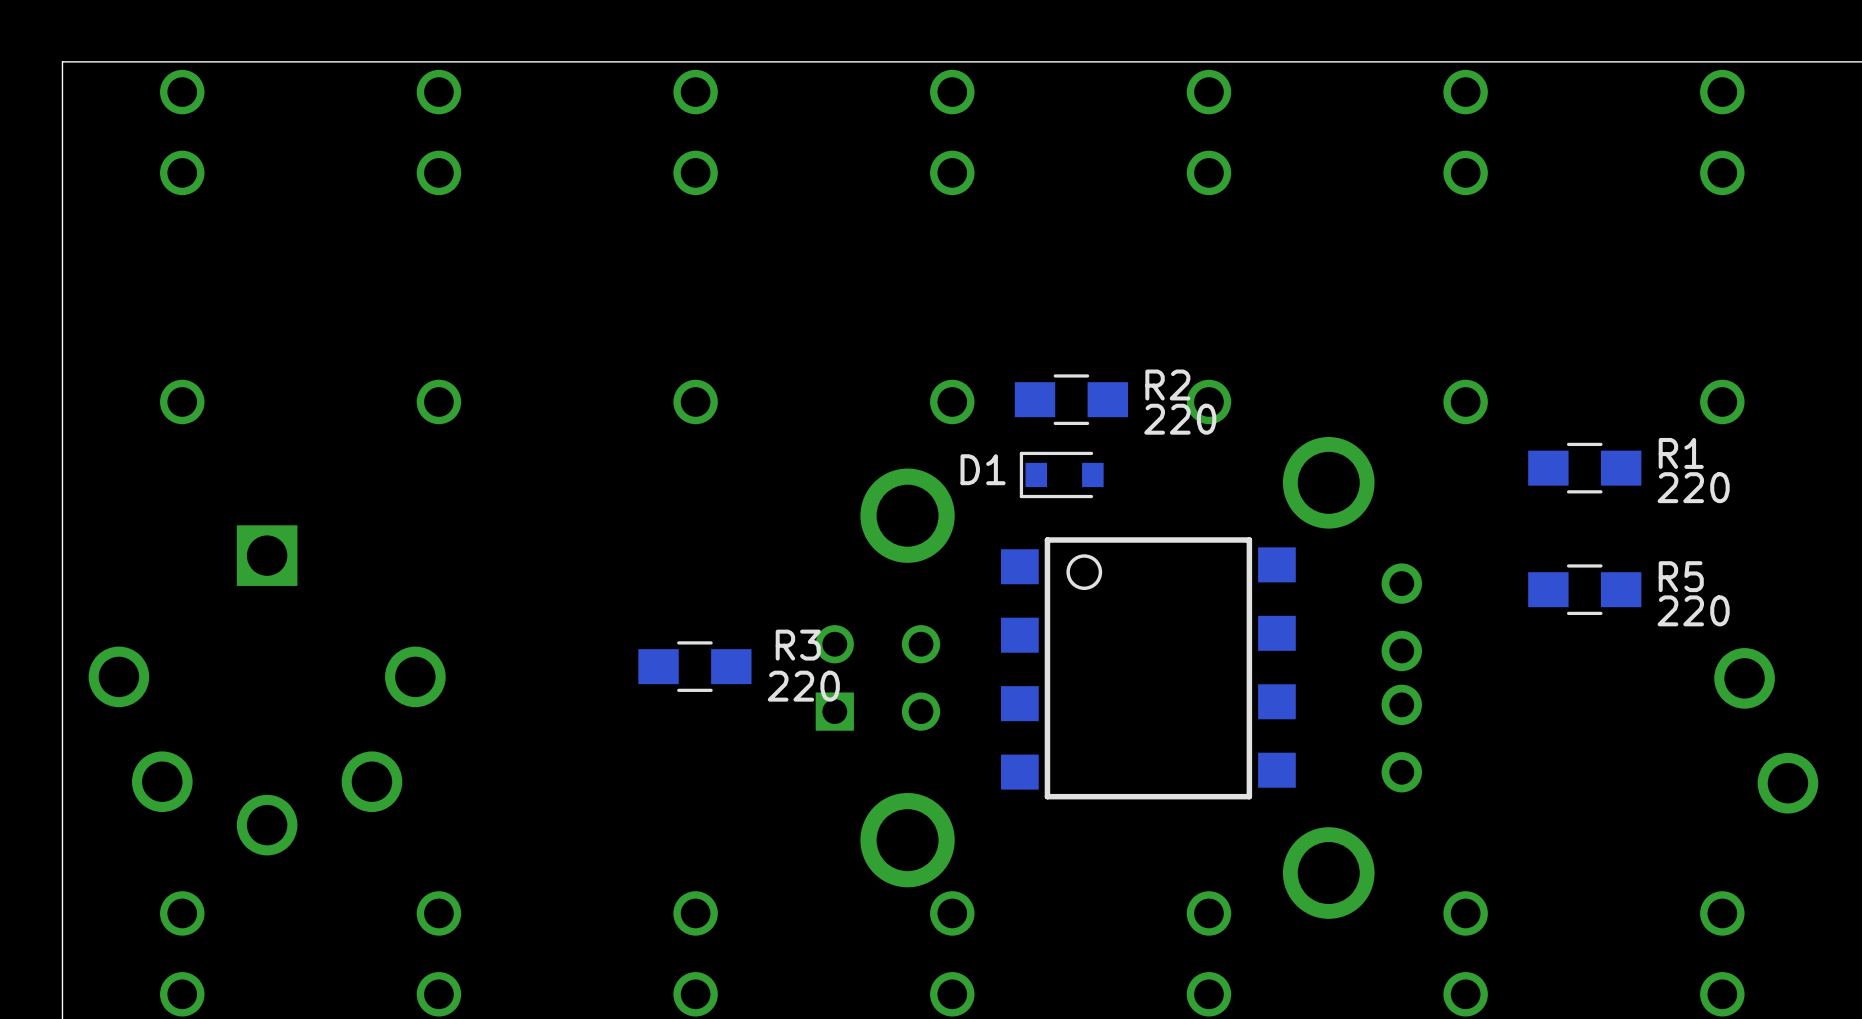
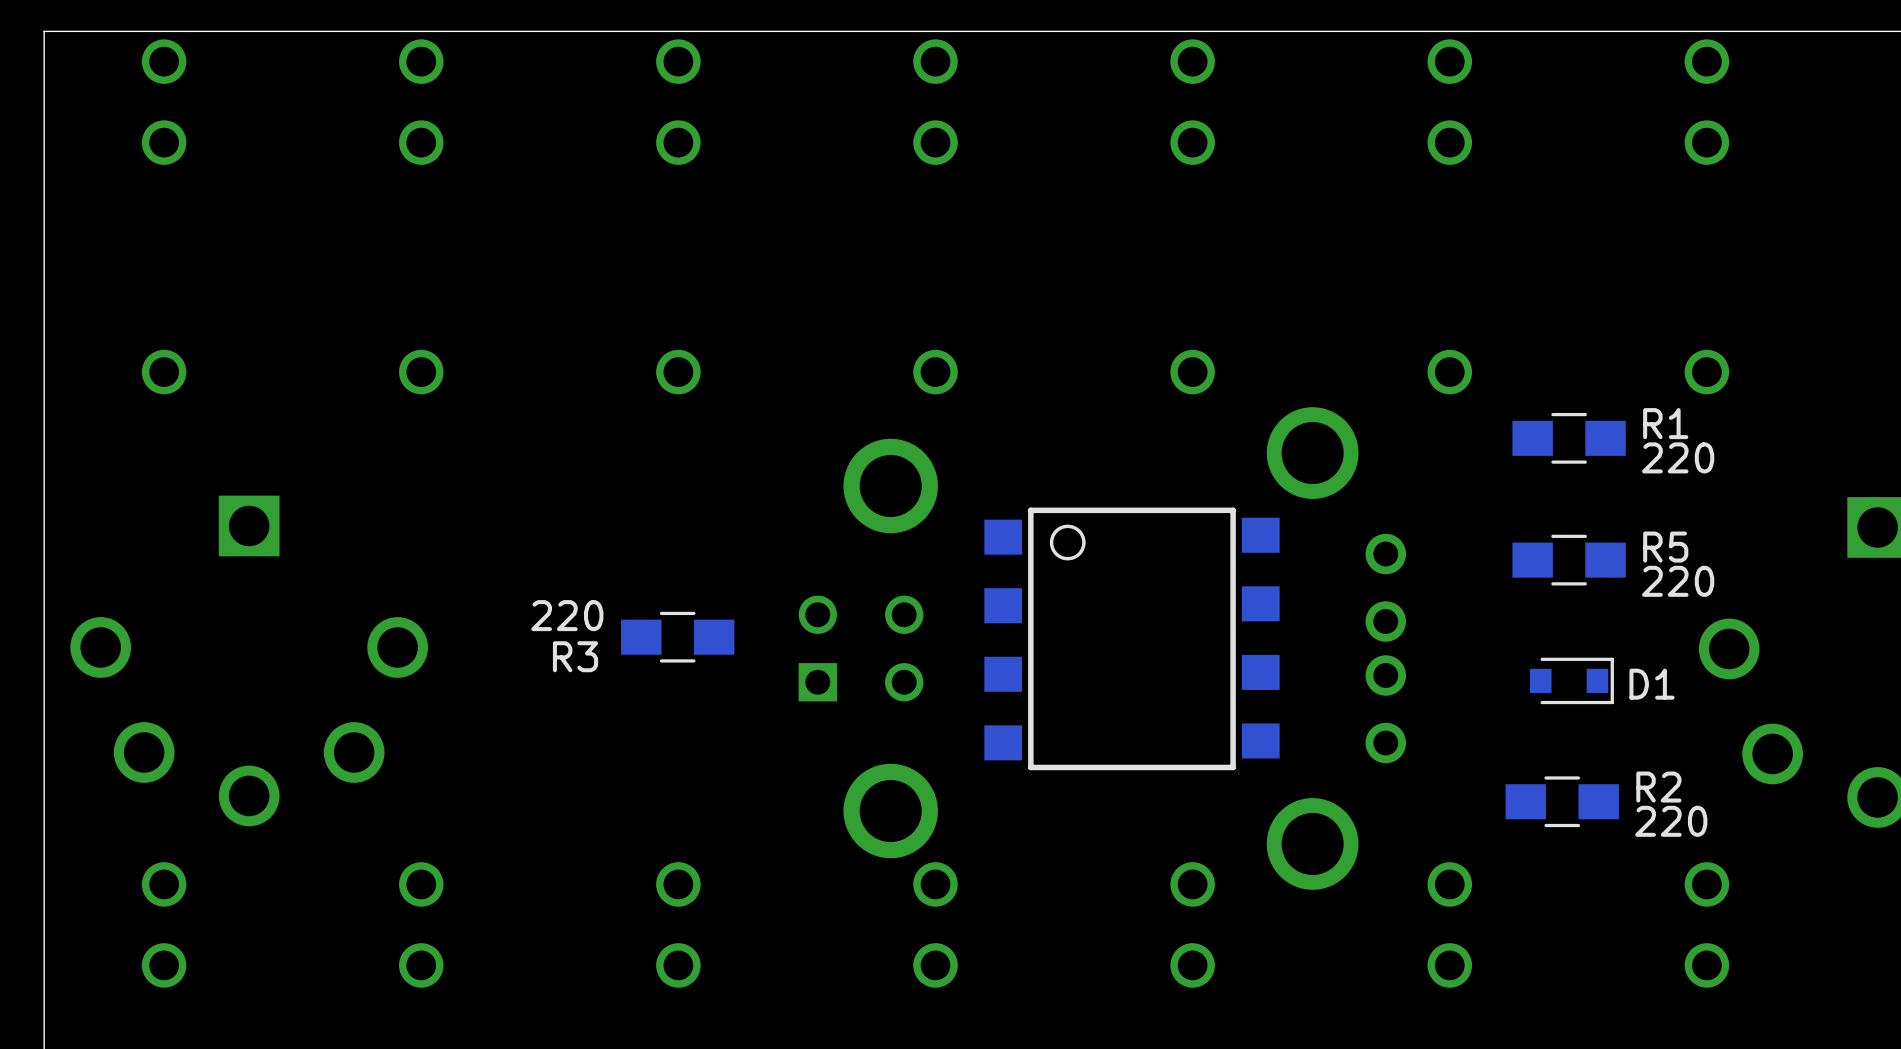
R2 position: (1071, 399) -> (1562, 801)
D1 rotation: 0° (1061, 474) -> 180° (1571, 680)
D1 position: (1061, 474) -> (1571, 680)
R3 name position: R3 (798, 645) -> R3 (575, 656)
R3 value position: 220 (803, 686) -> 220 (567, 615)

